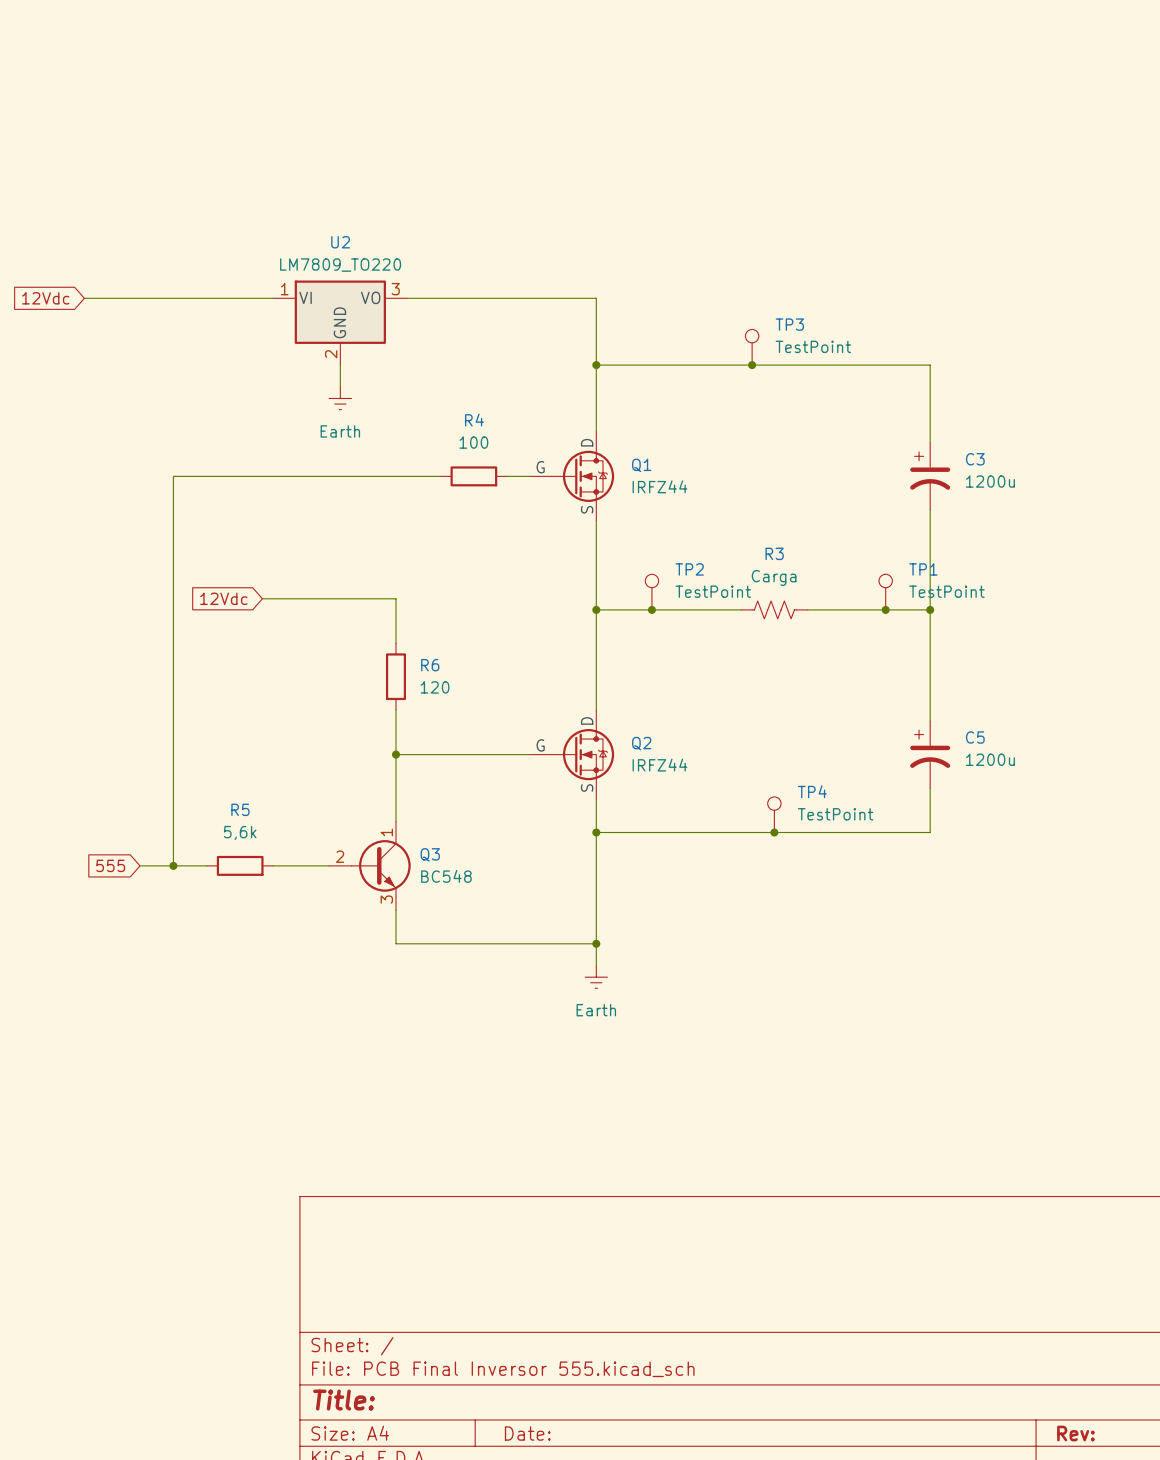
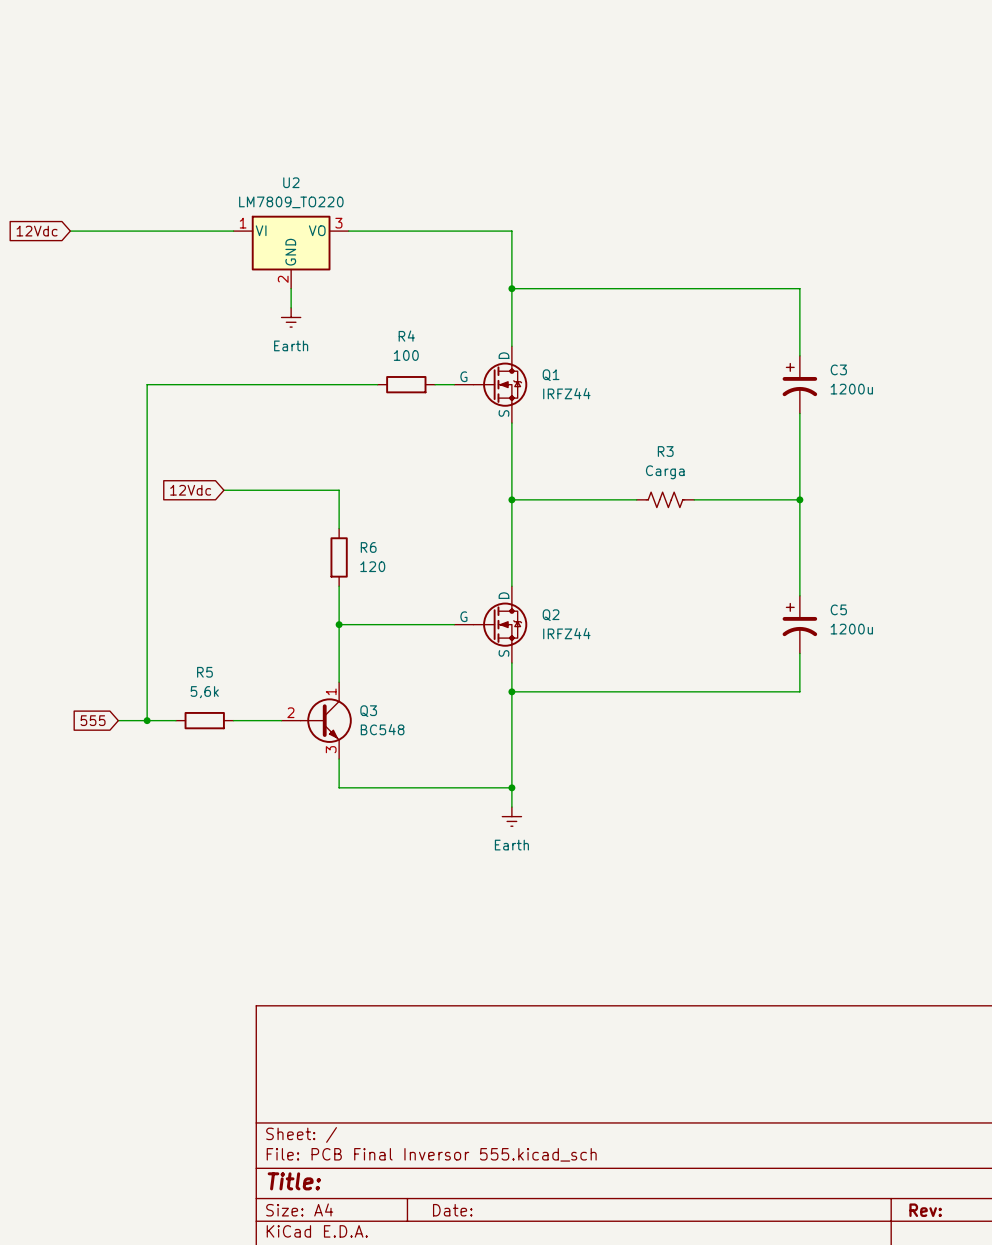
TP3: TestPoint (752, 347) -> none
junction: (752, 365) -> none
TP2: TestPoint (651, 592) -> none
TP1: TestPoint (885, 592) -> none
junction: (651, 609) -> none
junction: (885, 609) -> none
TP4: TestPoint (774, 814) -> none
junction: (774, 832) -> none

